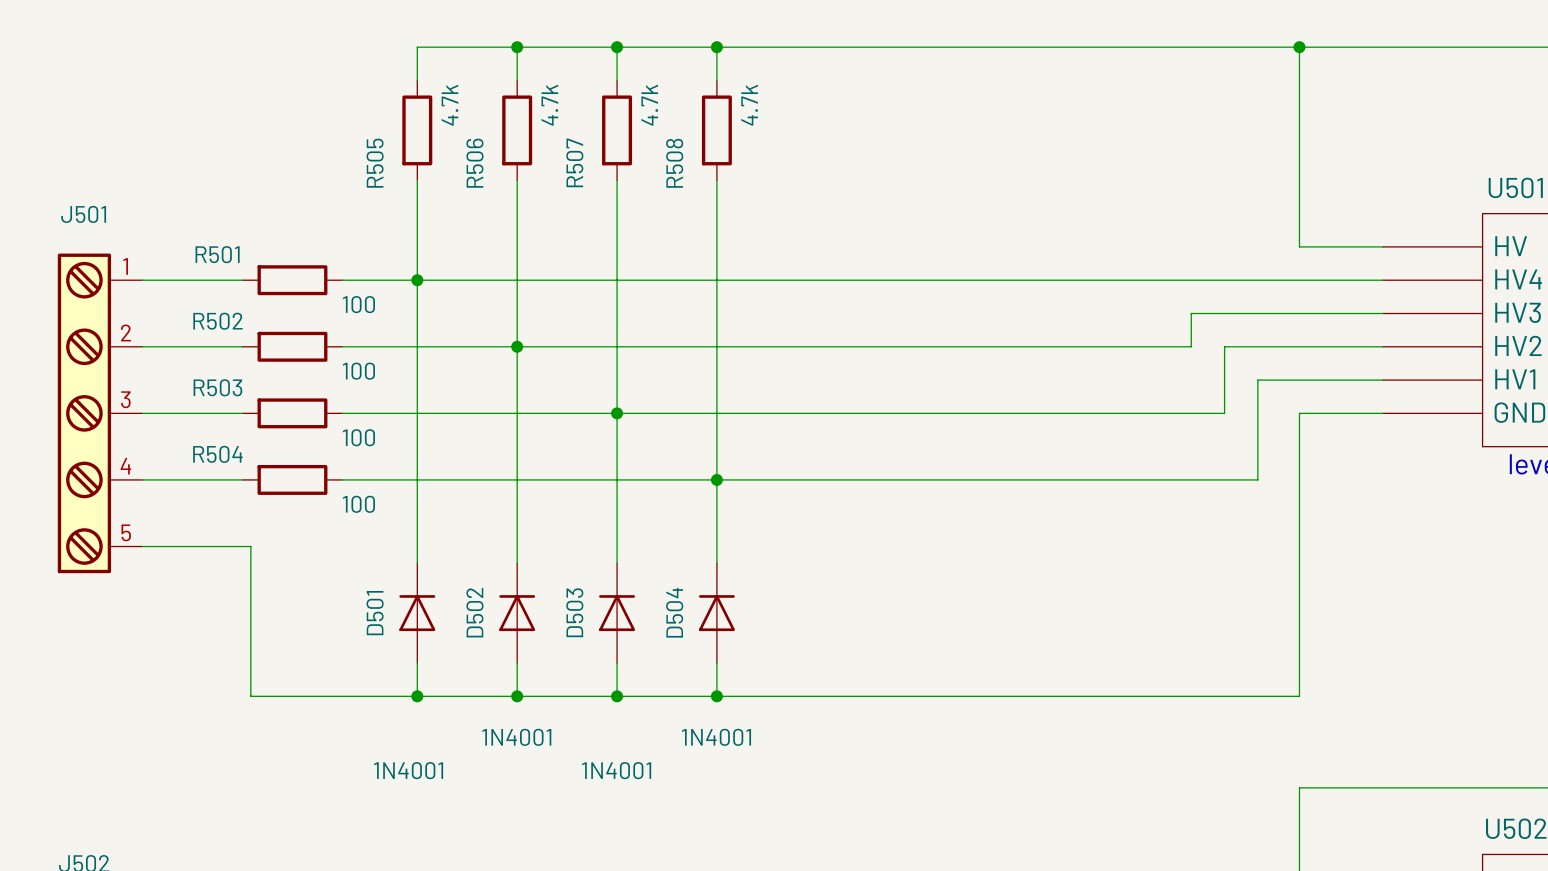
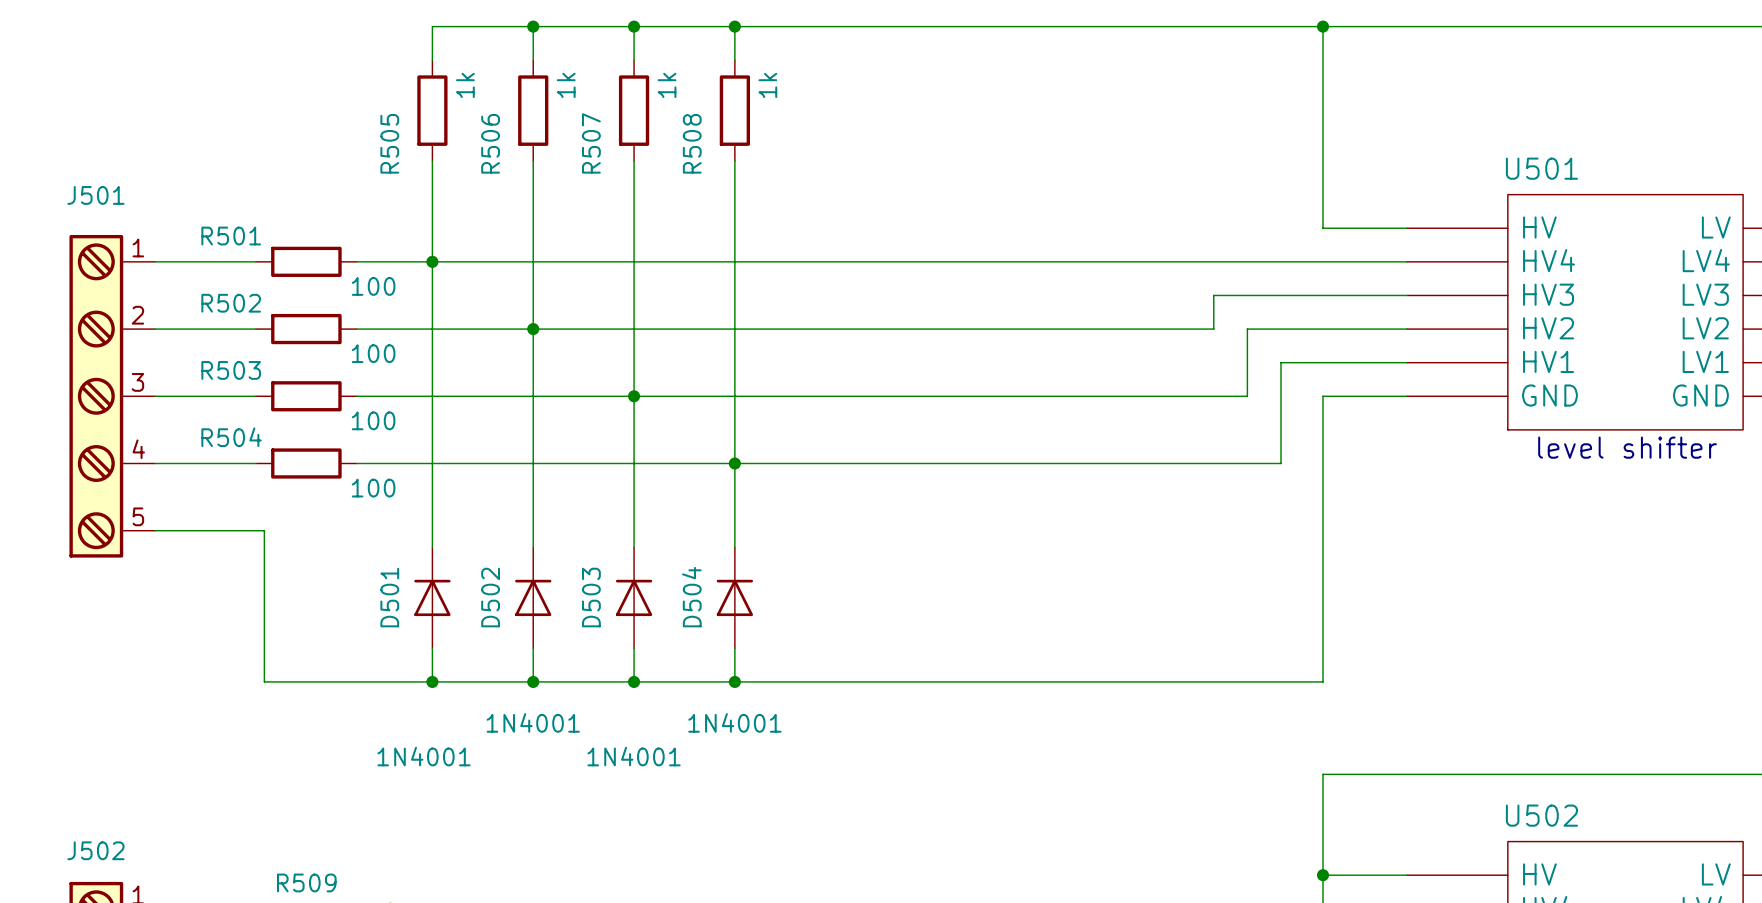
R505 value: 4.7k (450, 105) -> 1k (465, 85)
R506 value: 4.7k (549, 105) -> 1k (566, 85)
R507 value: 4.7k (649, 105) -> 1k (667, 85)
R508 value: 4.7k (749, 105) -> 1k (767, 85)

